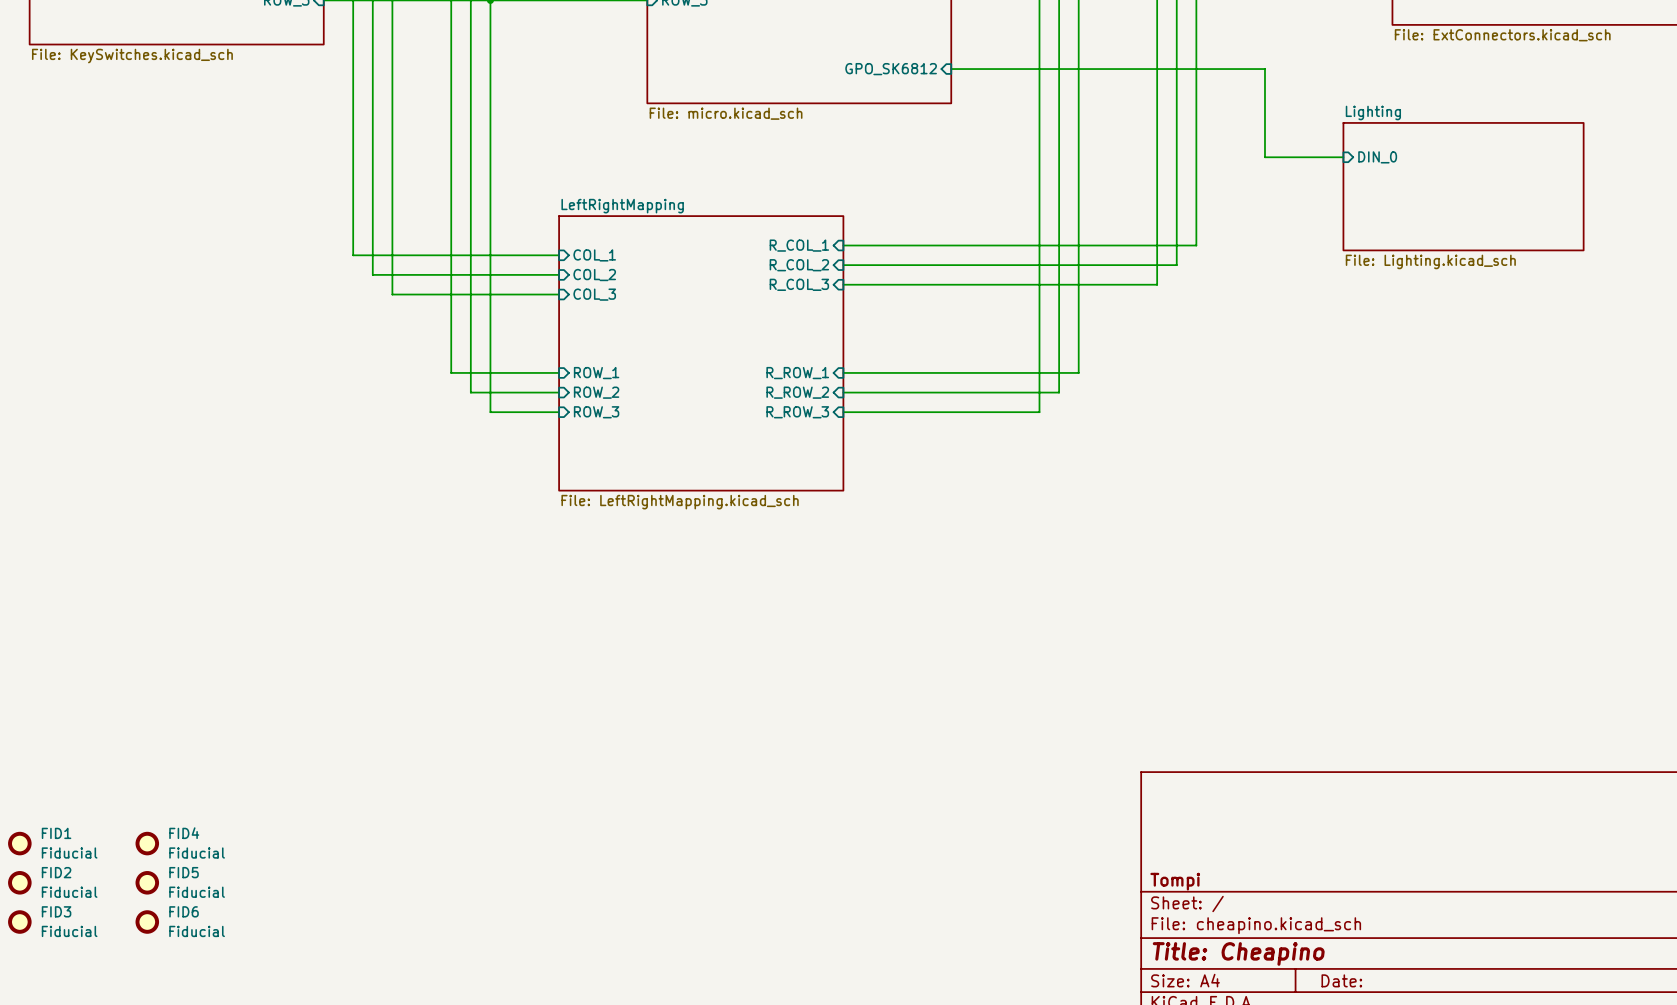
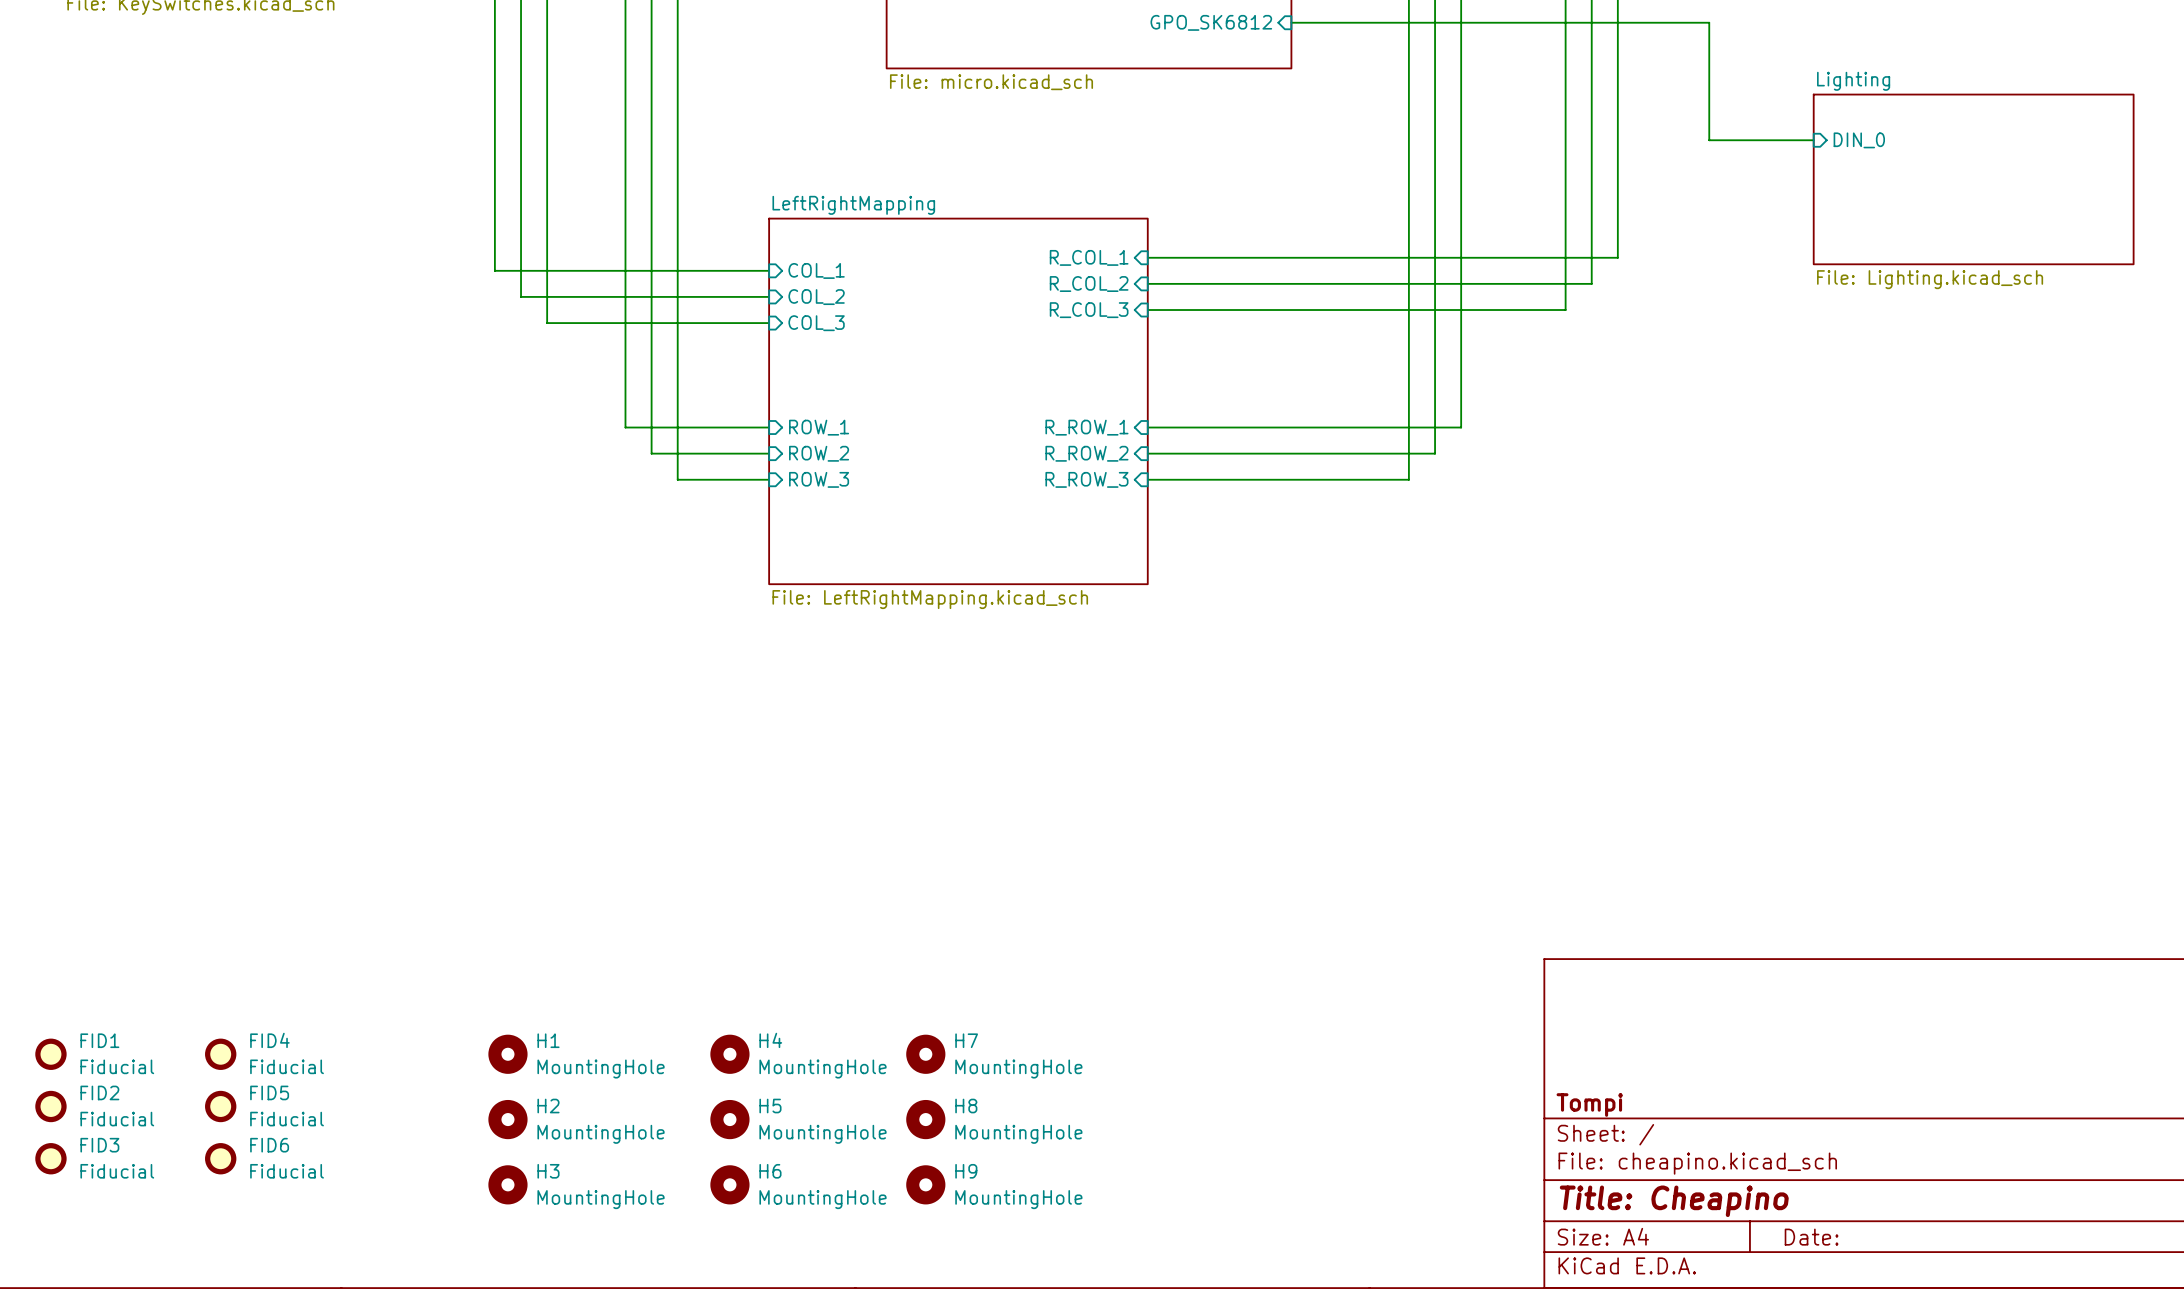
H1: none -> MountingHole (507, 1054)
H4: none -> MountingHole (729, 1054)
H7: none -> MountingHole (925, 1054)
H2: none -> MountingHole (507, 1119)
H5: none -> MountingHole (729, 1119)
H8: none -> MountingHole (925, 1119)
H3: none -> MountingHole (507, 1184)
H6: none -> MountingHole (729, 1184)
H9: none -> MountingHole (925, 1184)

